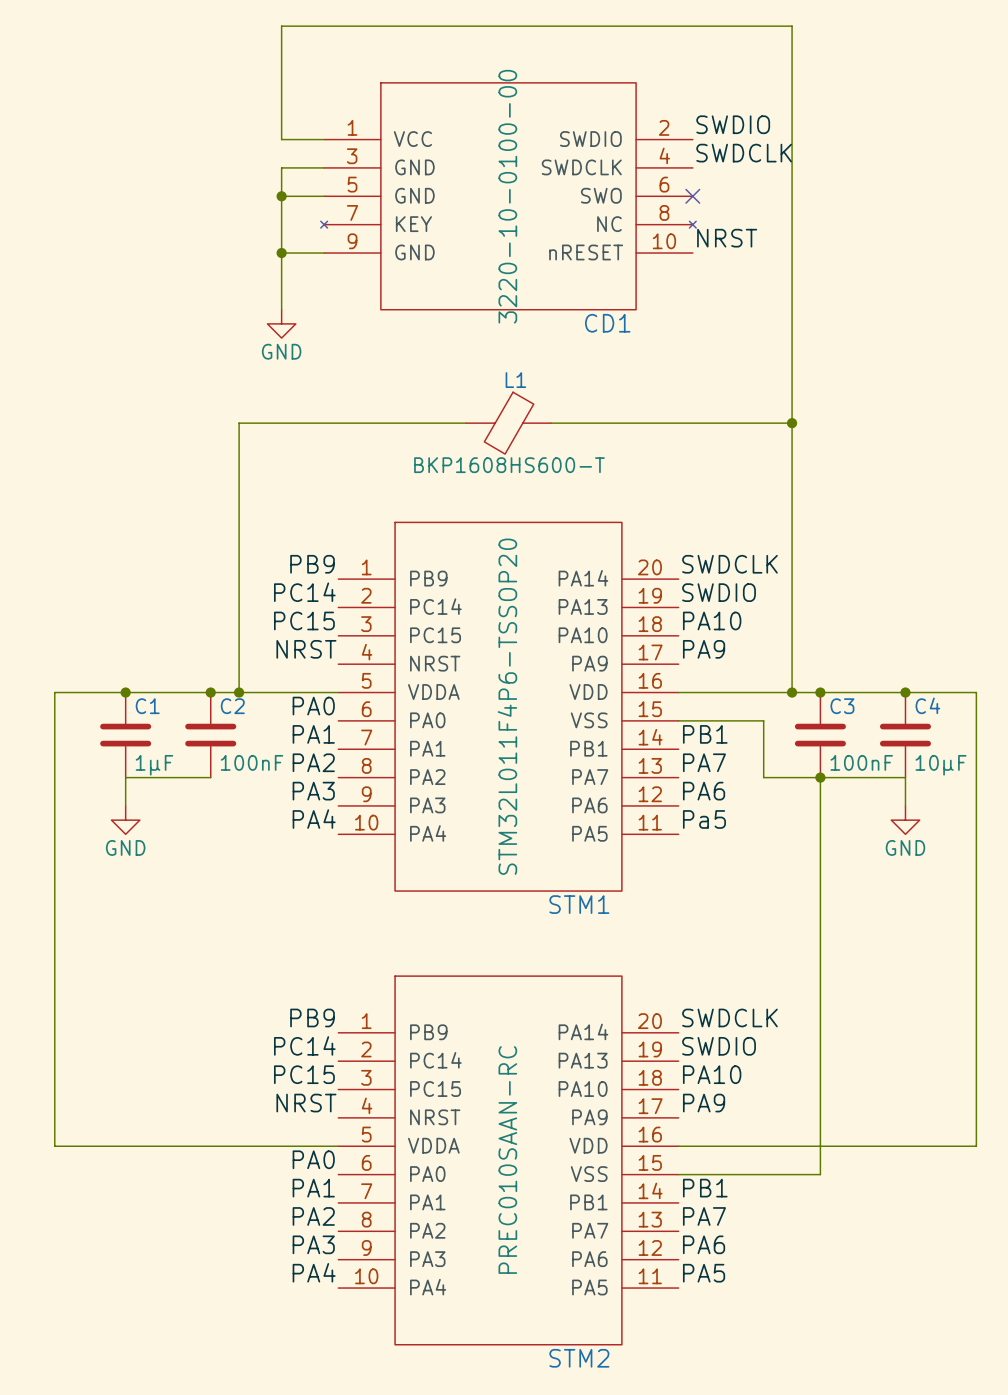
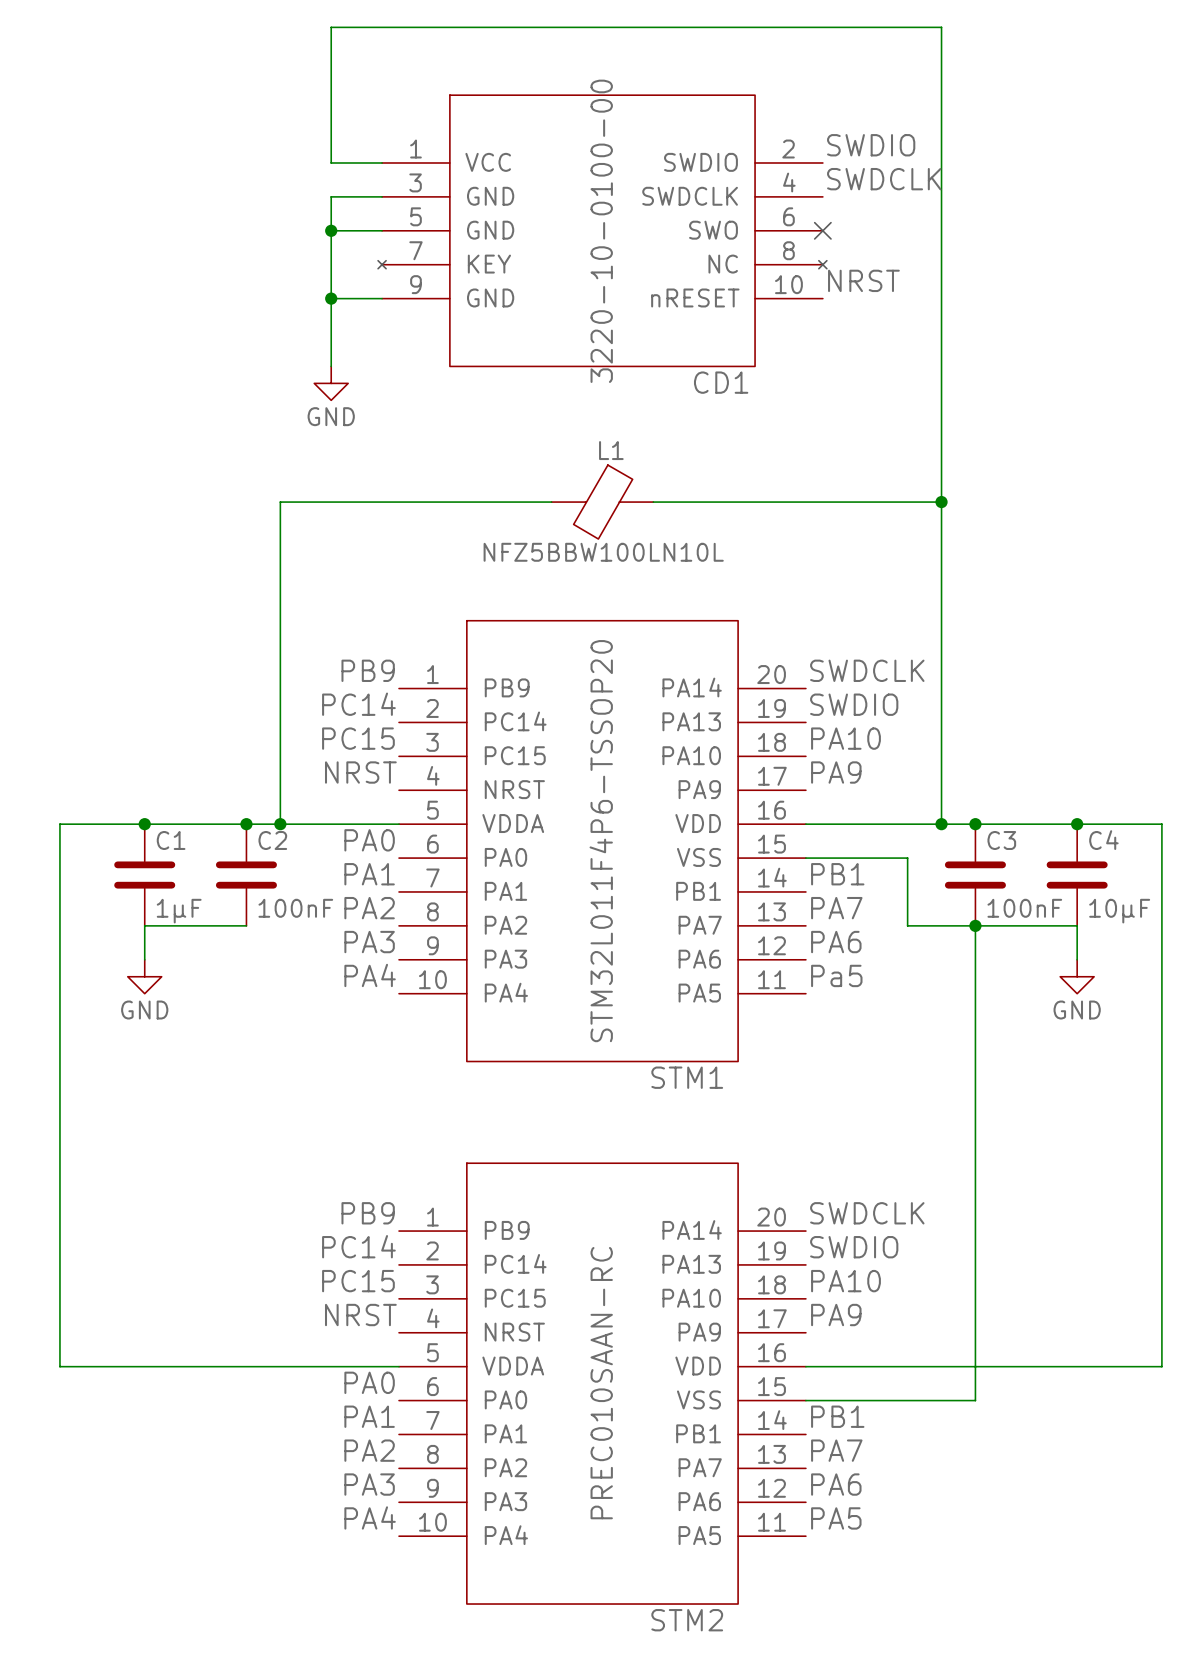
L1 value: BKP1608HS600-T (509, 465) -> NFZ5BBW100LN10L (603, 552)

